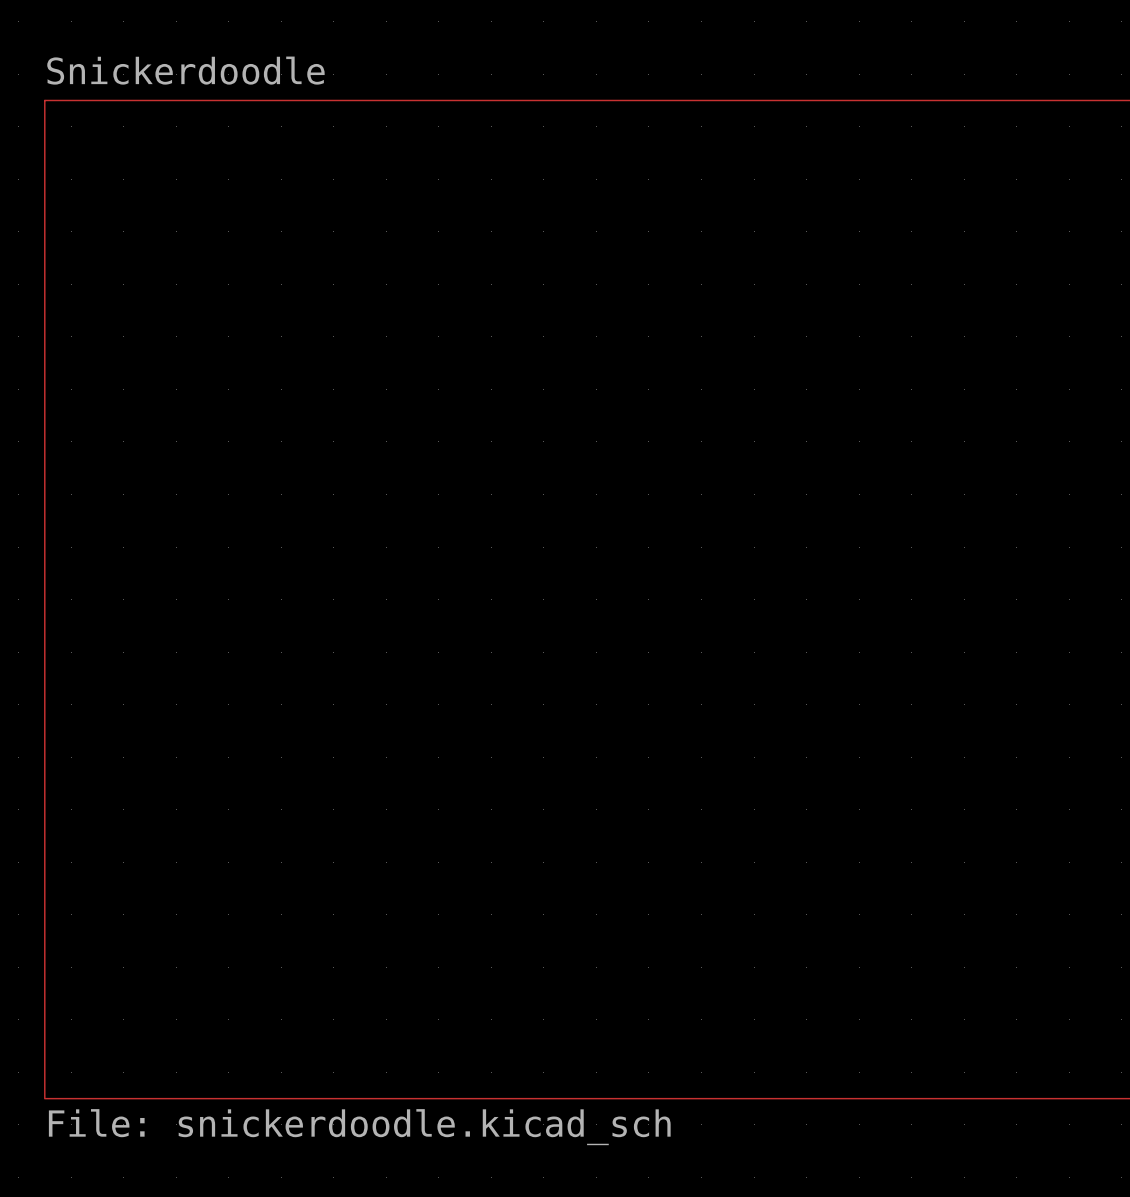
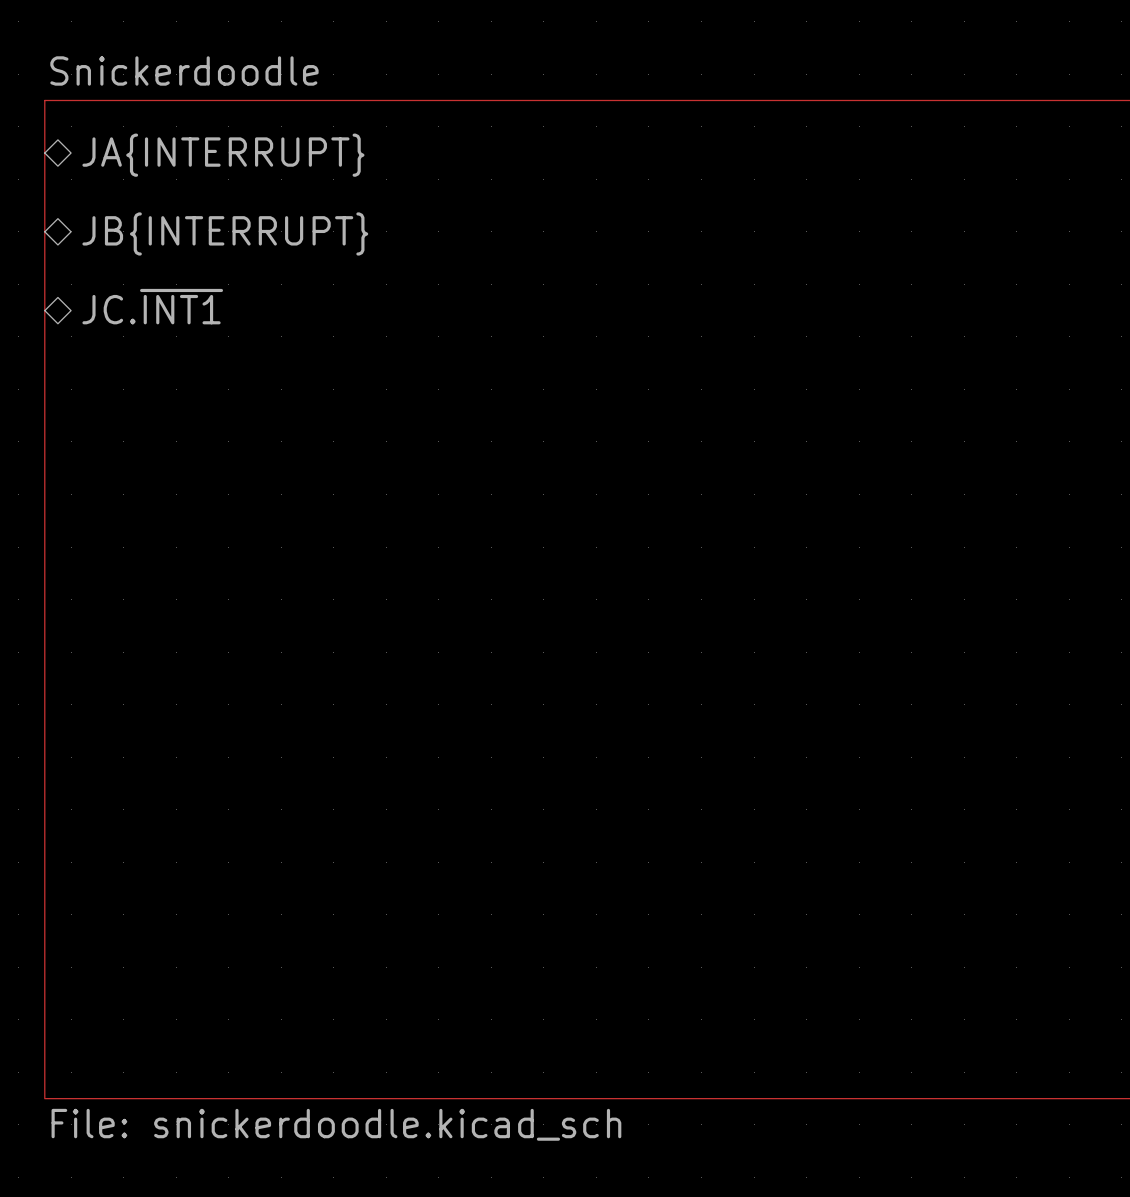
sheet pin: none -> JA{INTERRUPT} (223, 155)
sheet pin: none -> JB{INTERRUPT} (225, 233)
sheet pin: none -> JC.~{INT1} (152, 306)

